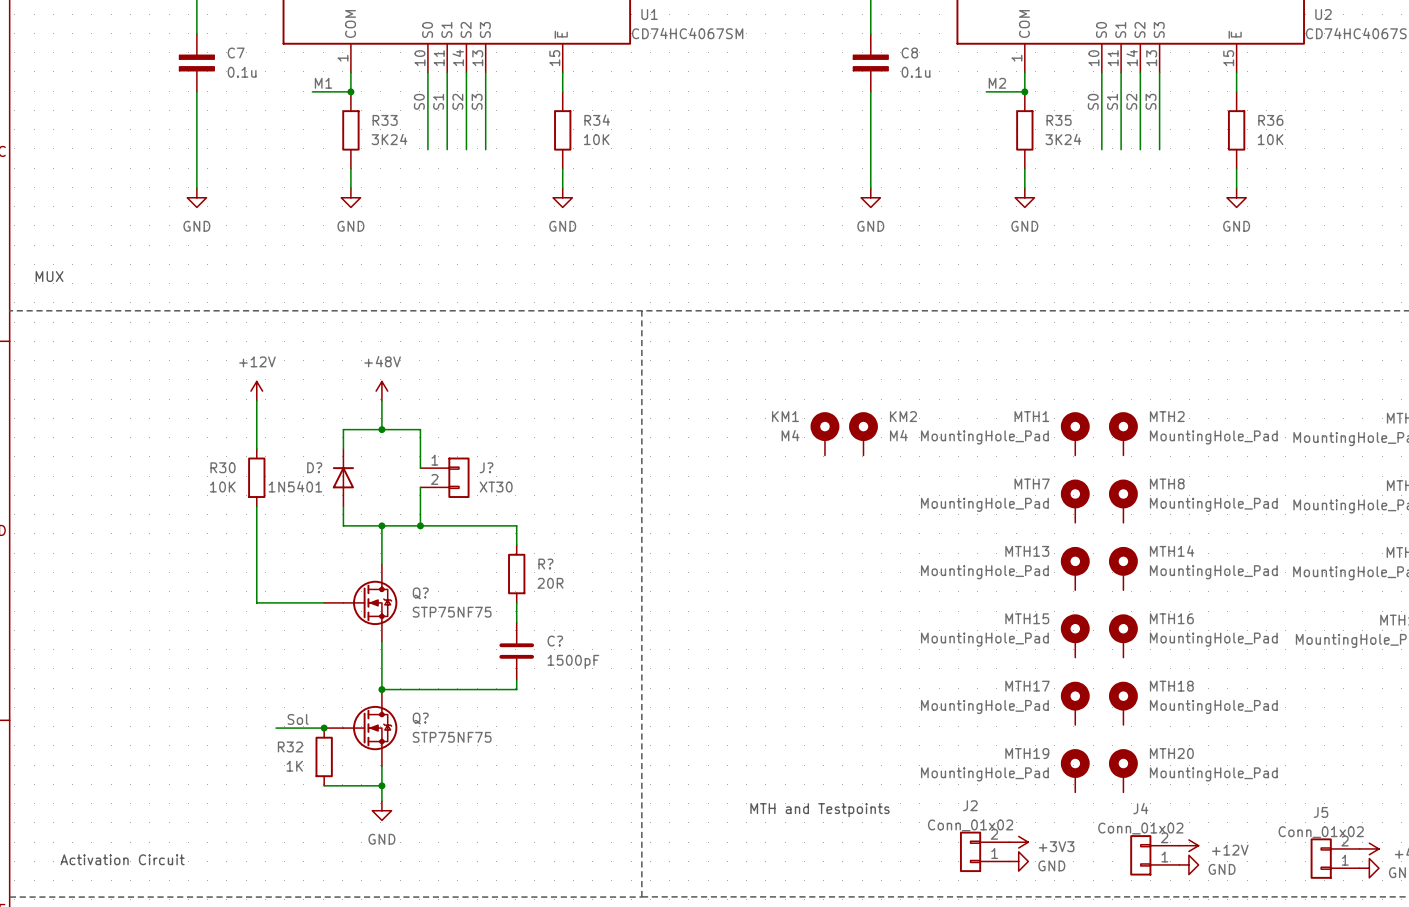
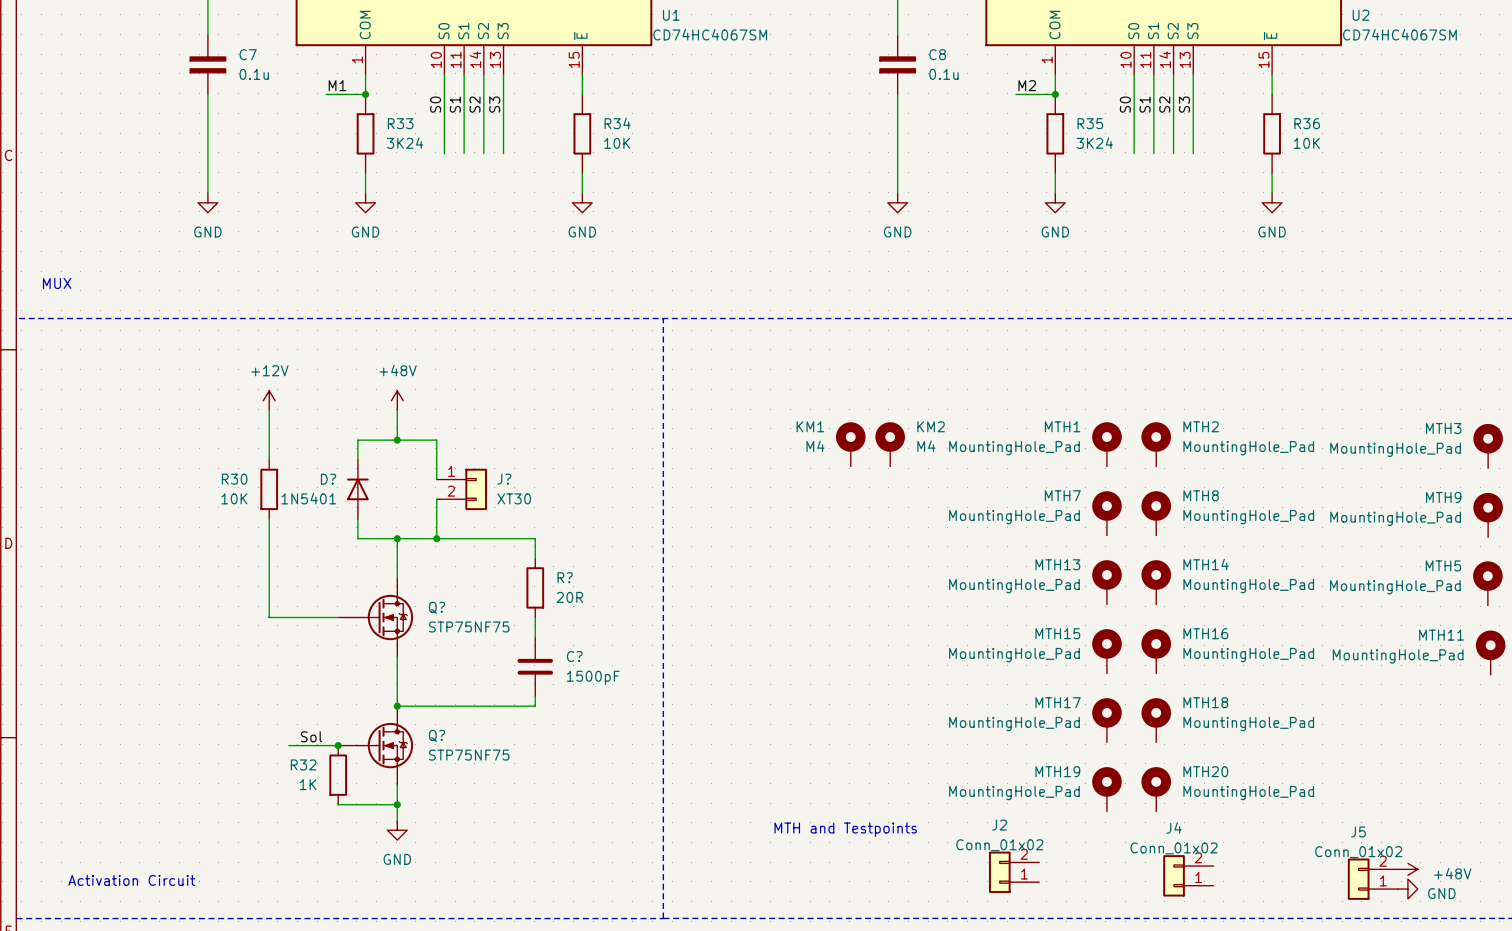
power symbol: +3V3 (1018, 842) -> none
power symbol: +12V (1188, 845) -> none
power symbol: GND (1018, 861) -> none
power symbol: GND (1188, 864) -> none

